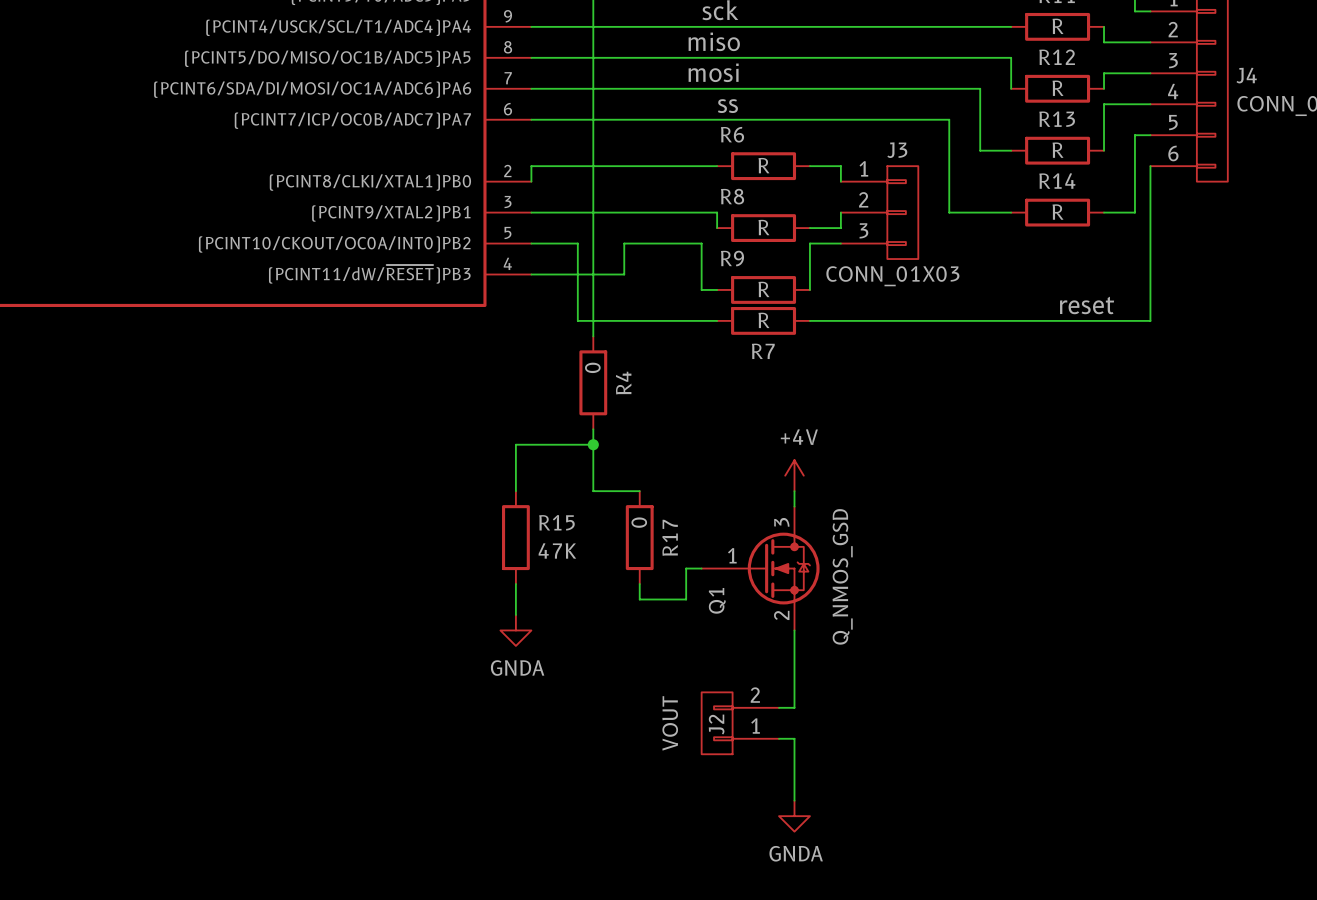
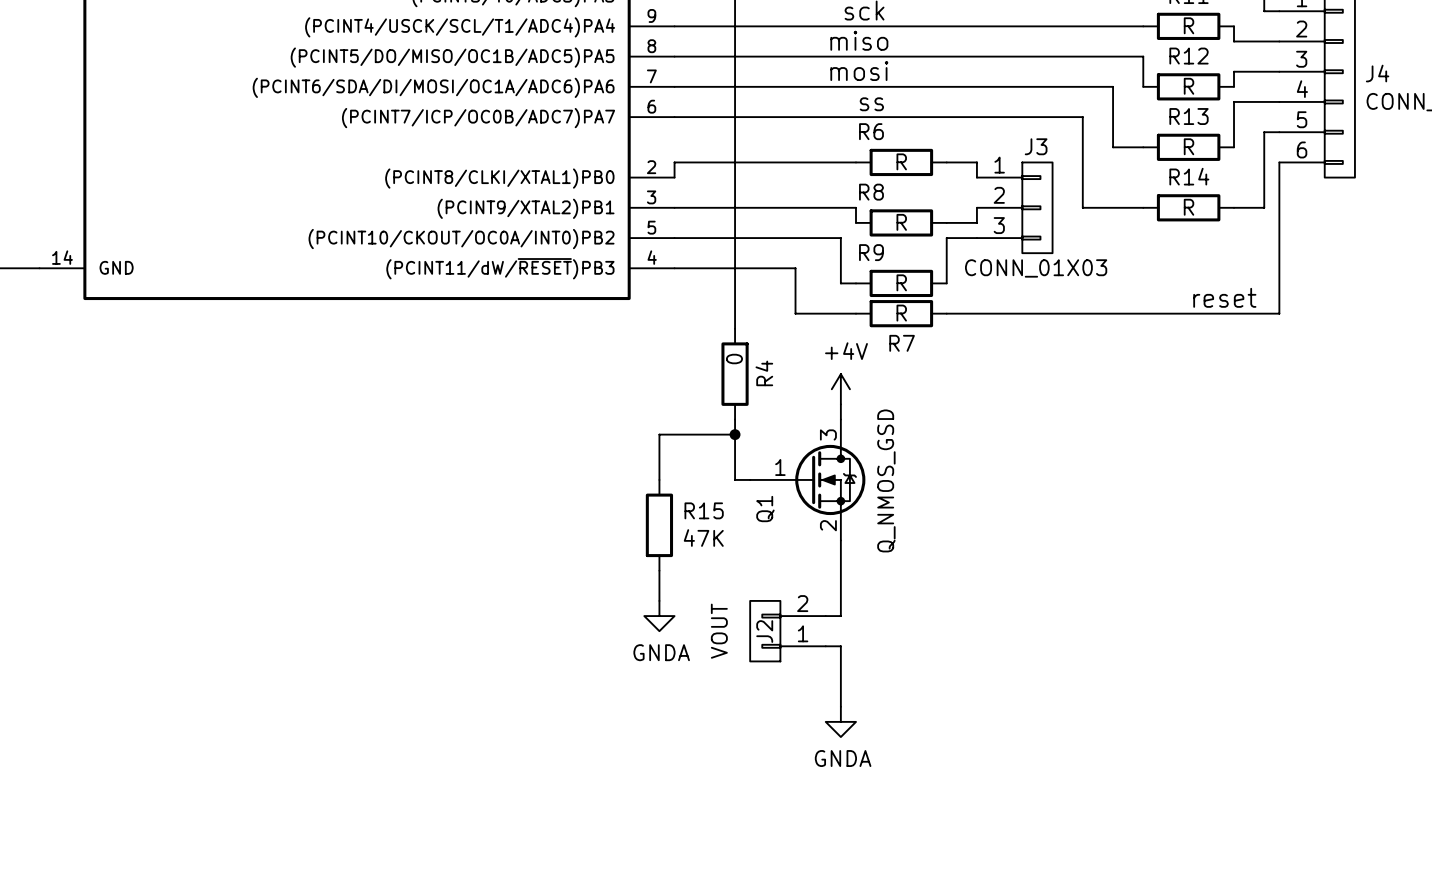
wire: (577, 243) (577, 320) (655, 320) -> (765, 268) (795, 268) (795, 313)
wire: (624, 243) (624, 274) -> (765, 238) (719, 238)
power symbol position: +4V (794, 475) -> +4V (840, 389)
wire: (794, 491) (794, 506) -> (840, 404) (840, 419)
R17: 0 (639, 537) -> none
wire: (701, 568) (686, 568) (686, 599) (639, 599) (639, 584) -> none
Q1 position: (760, 568) -> (807, 479)
wire: (794, 630) (794, 707) (779, 707) -> (840, 540) (840, 616) (825, 616)
J2 position: (740, 723) -> (787, 631)
wire: (779, 738) (794, 738) (794, 800) -> (825, 646) (840, 646) (840, 706)
power symbol position: GNDA (794, 816) -> GNDA (840, 721)

